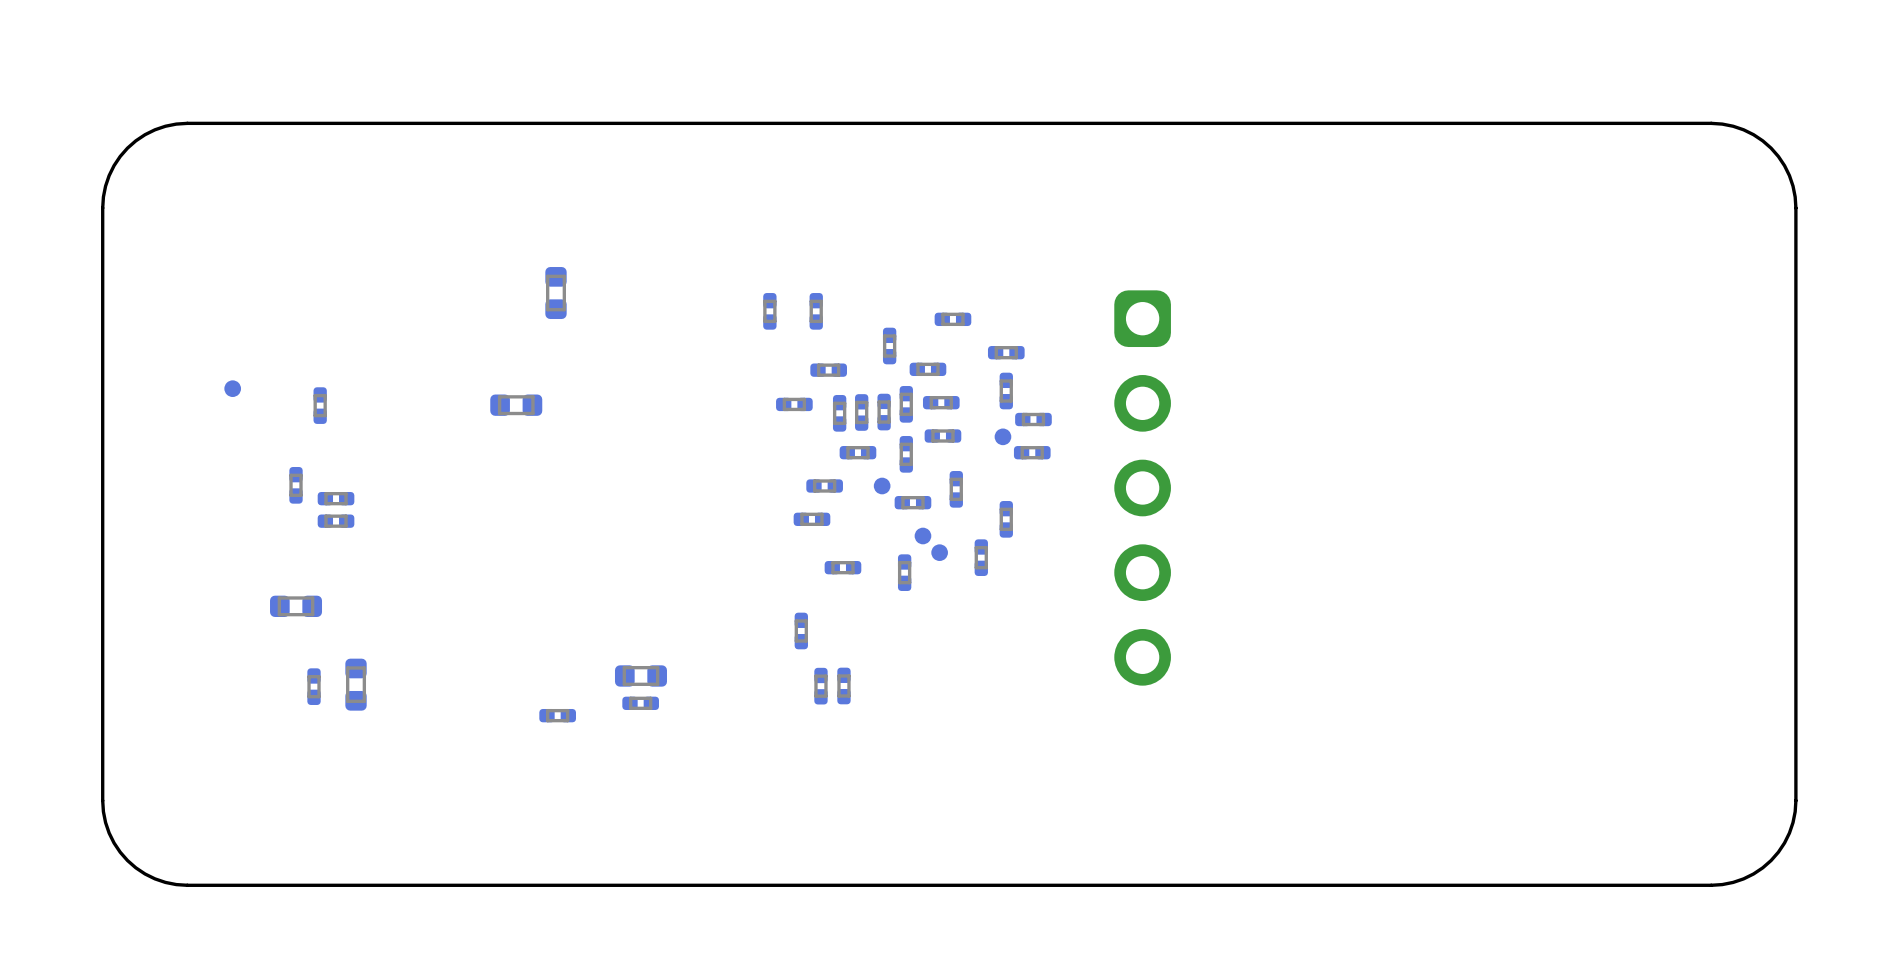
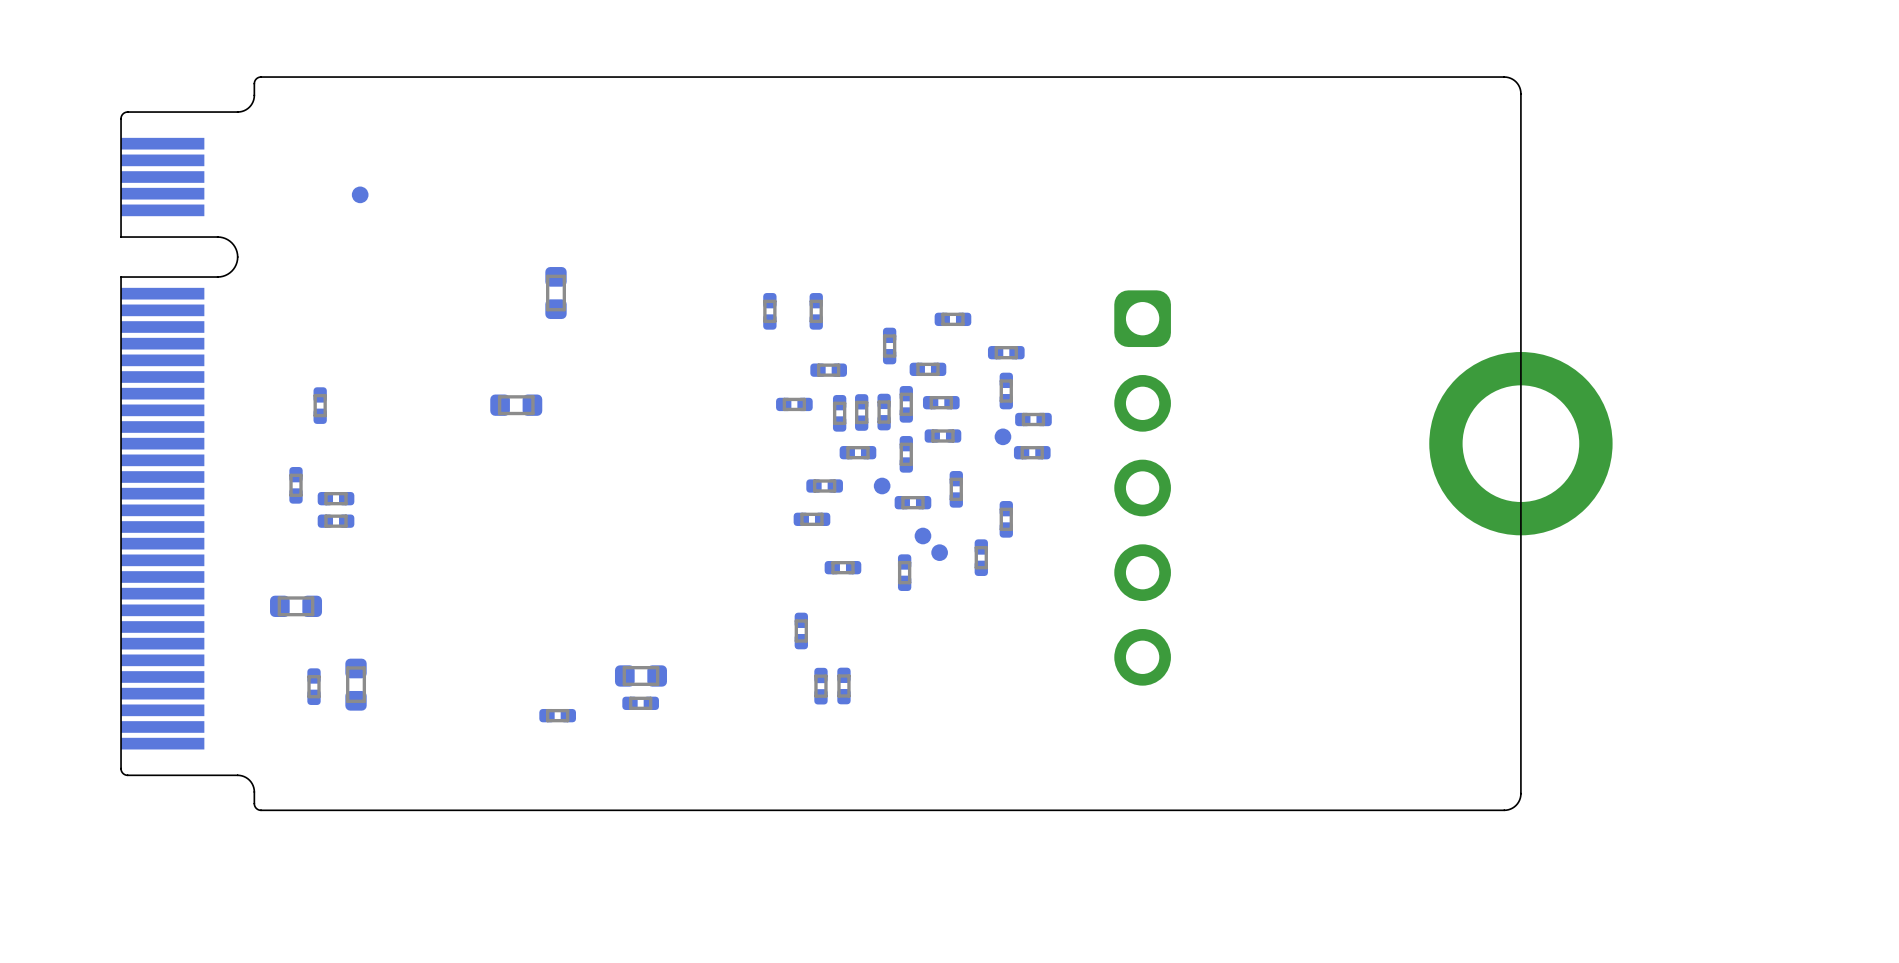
board edge: (1711, 123) (187, 123) (154, 129) (135, 140) (120, 156) (109, 175) (102, 208) (102, 800) (109, 833) (120, 852) (135, 867) (154, 878) (187, 885) (1711, 885) (1743, 878) (1762, 867) (1778, 852) (1789, 833) (1795, 811) (1795, 208) (1789, 175) (1771, 148) (1743, 129) (1711, 123) -> none
part position: (232, 388) -> (360, 194)
part: none -> (866, 443)

